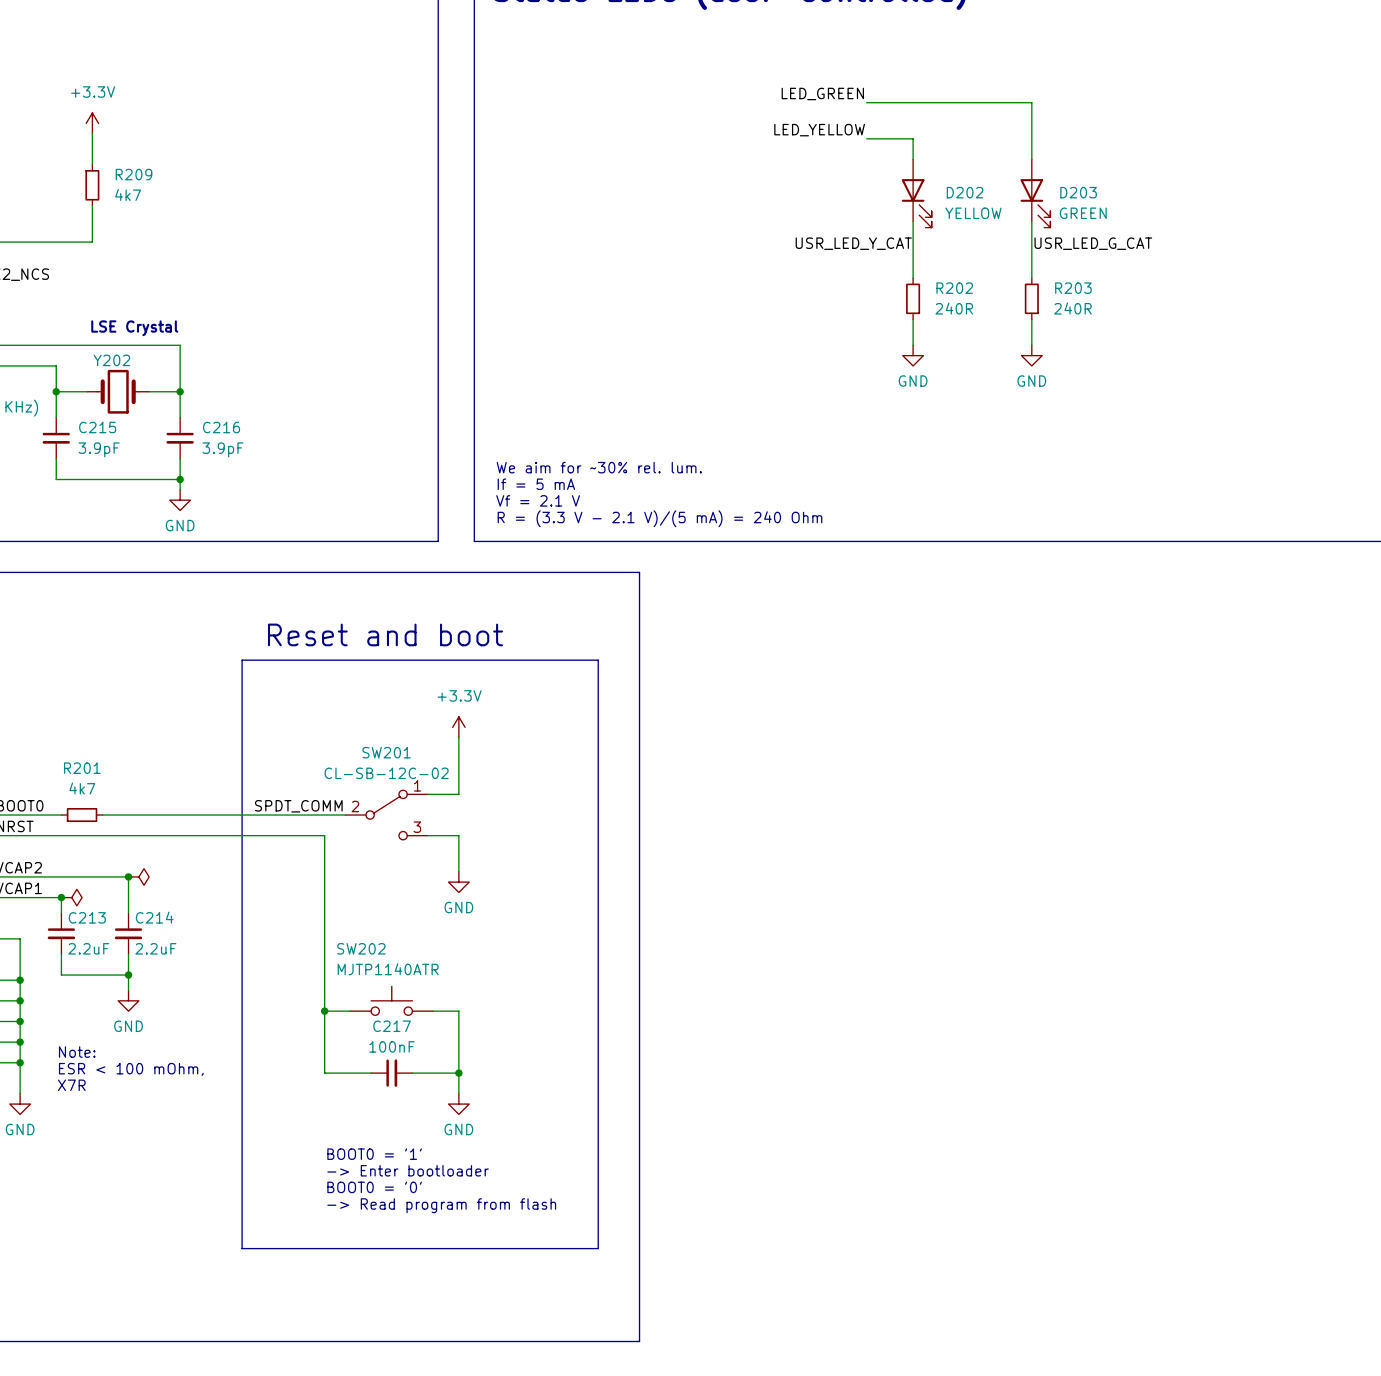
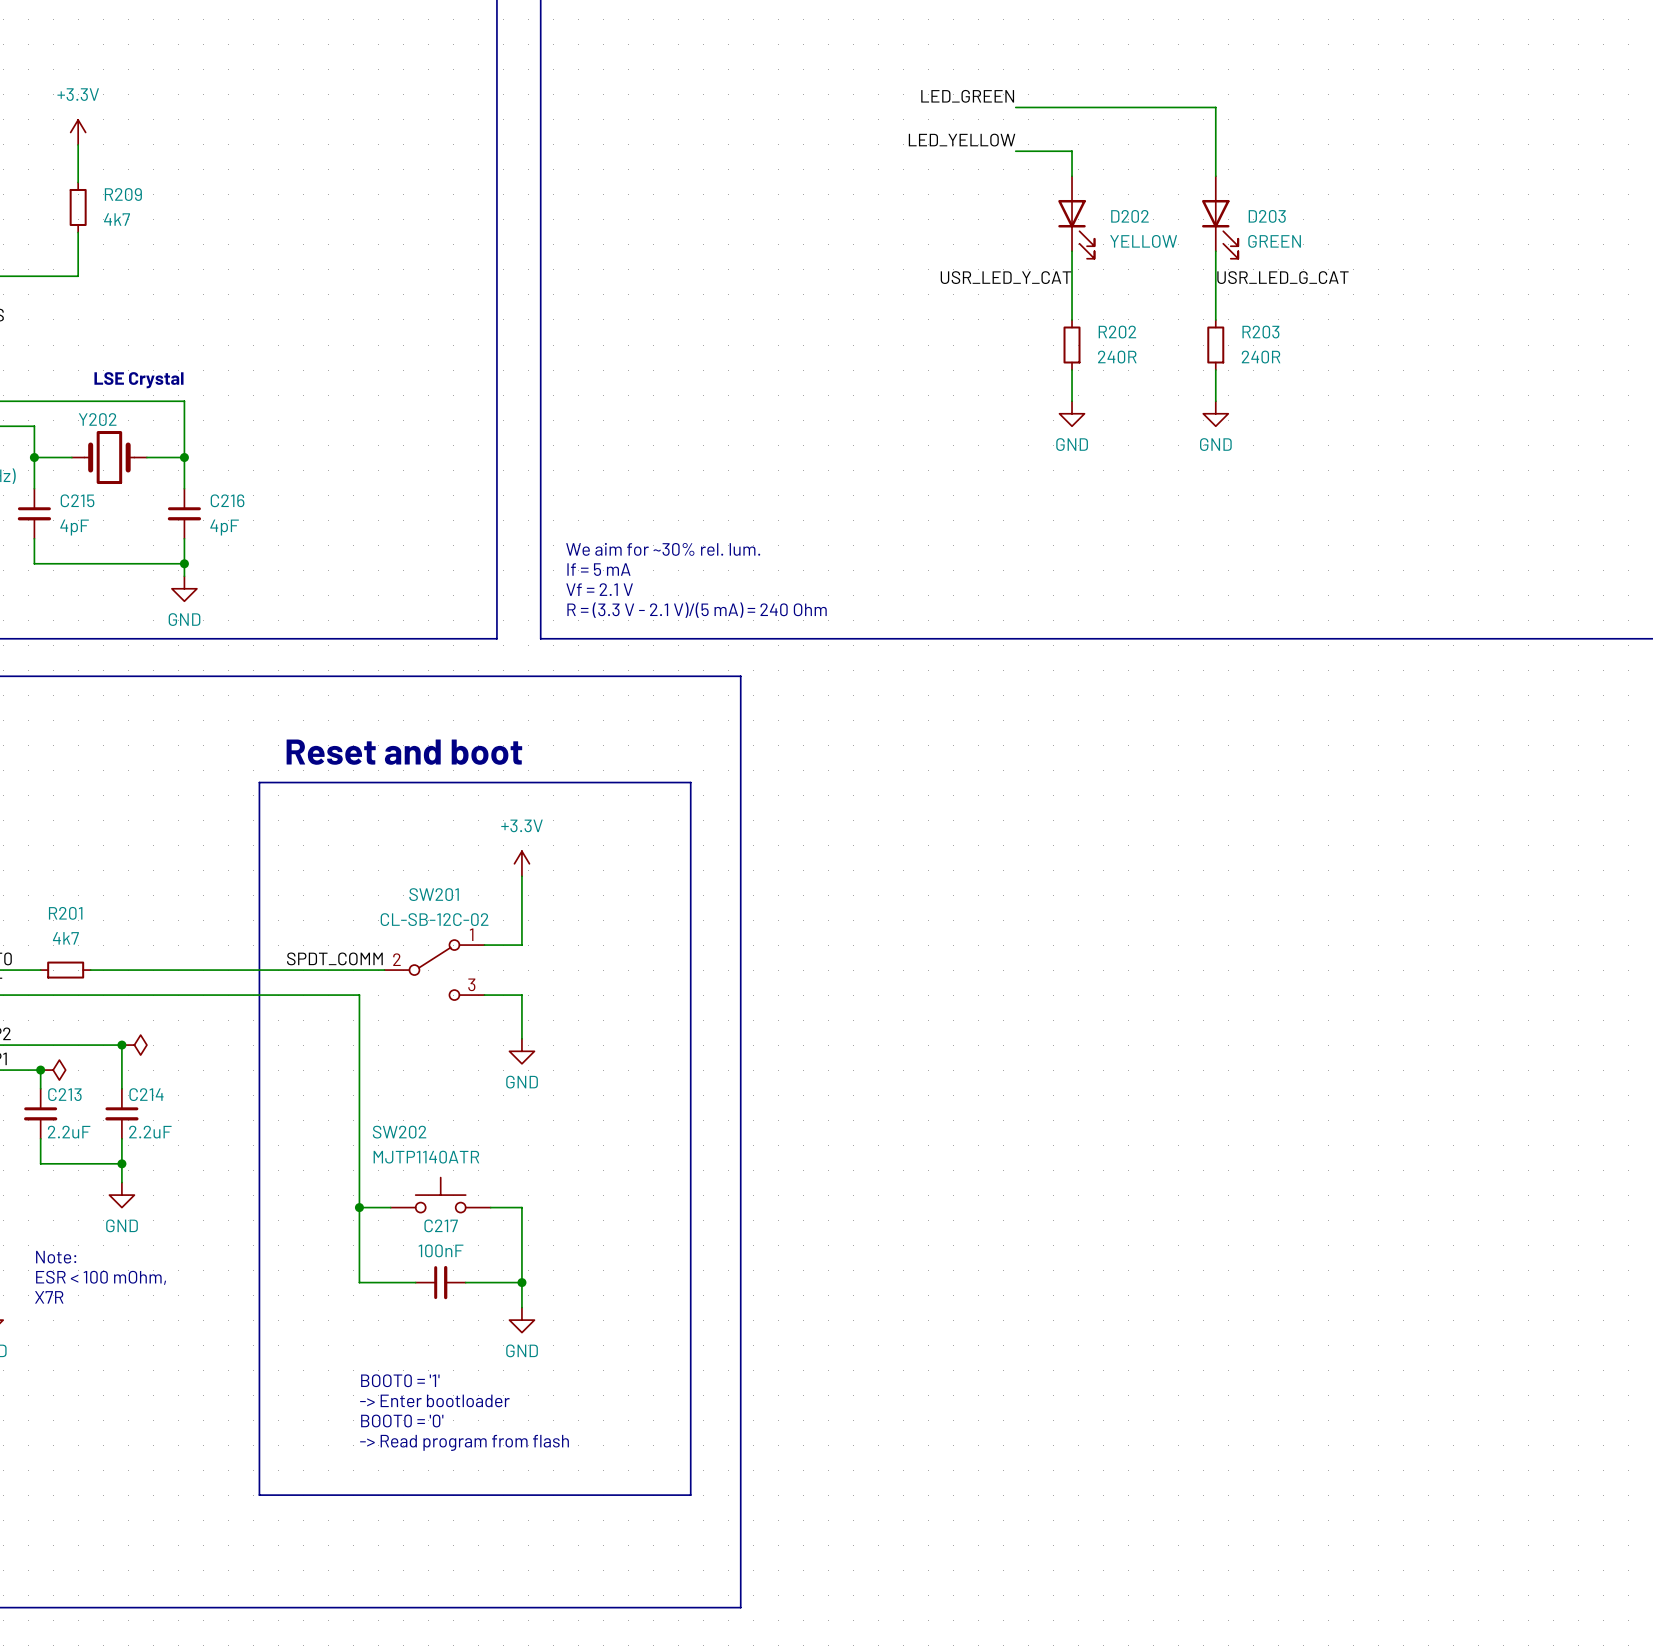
C215 value: 3.9pF (99, 449) -> 4pF (74, 527)
C216 value: 3.9pF (222, 449) -> 4pF (224, 527)

